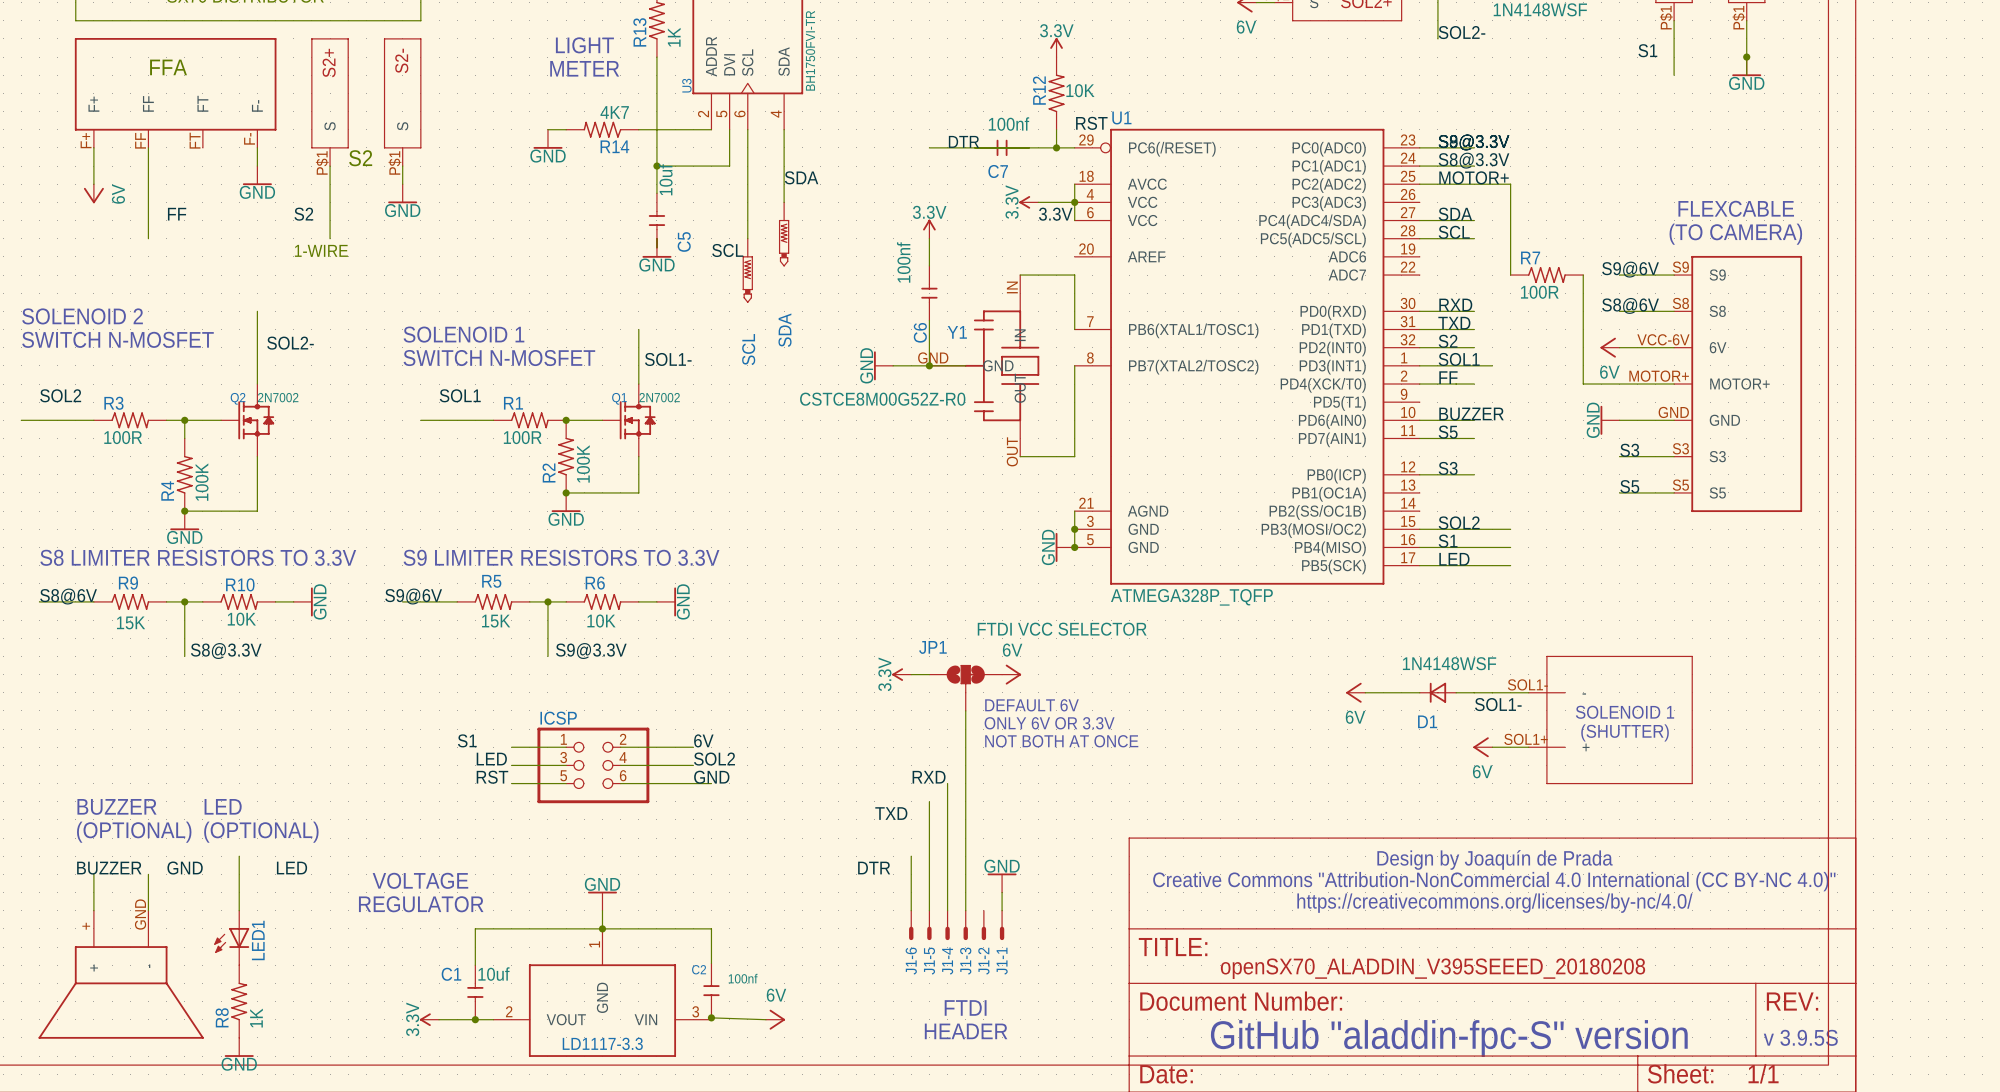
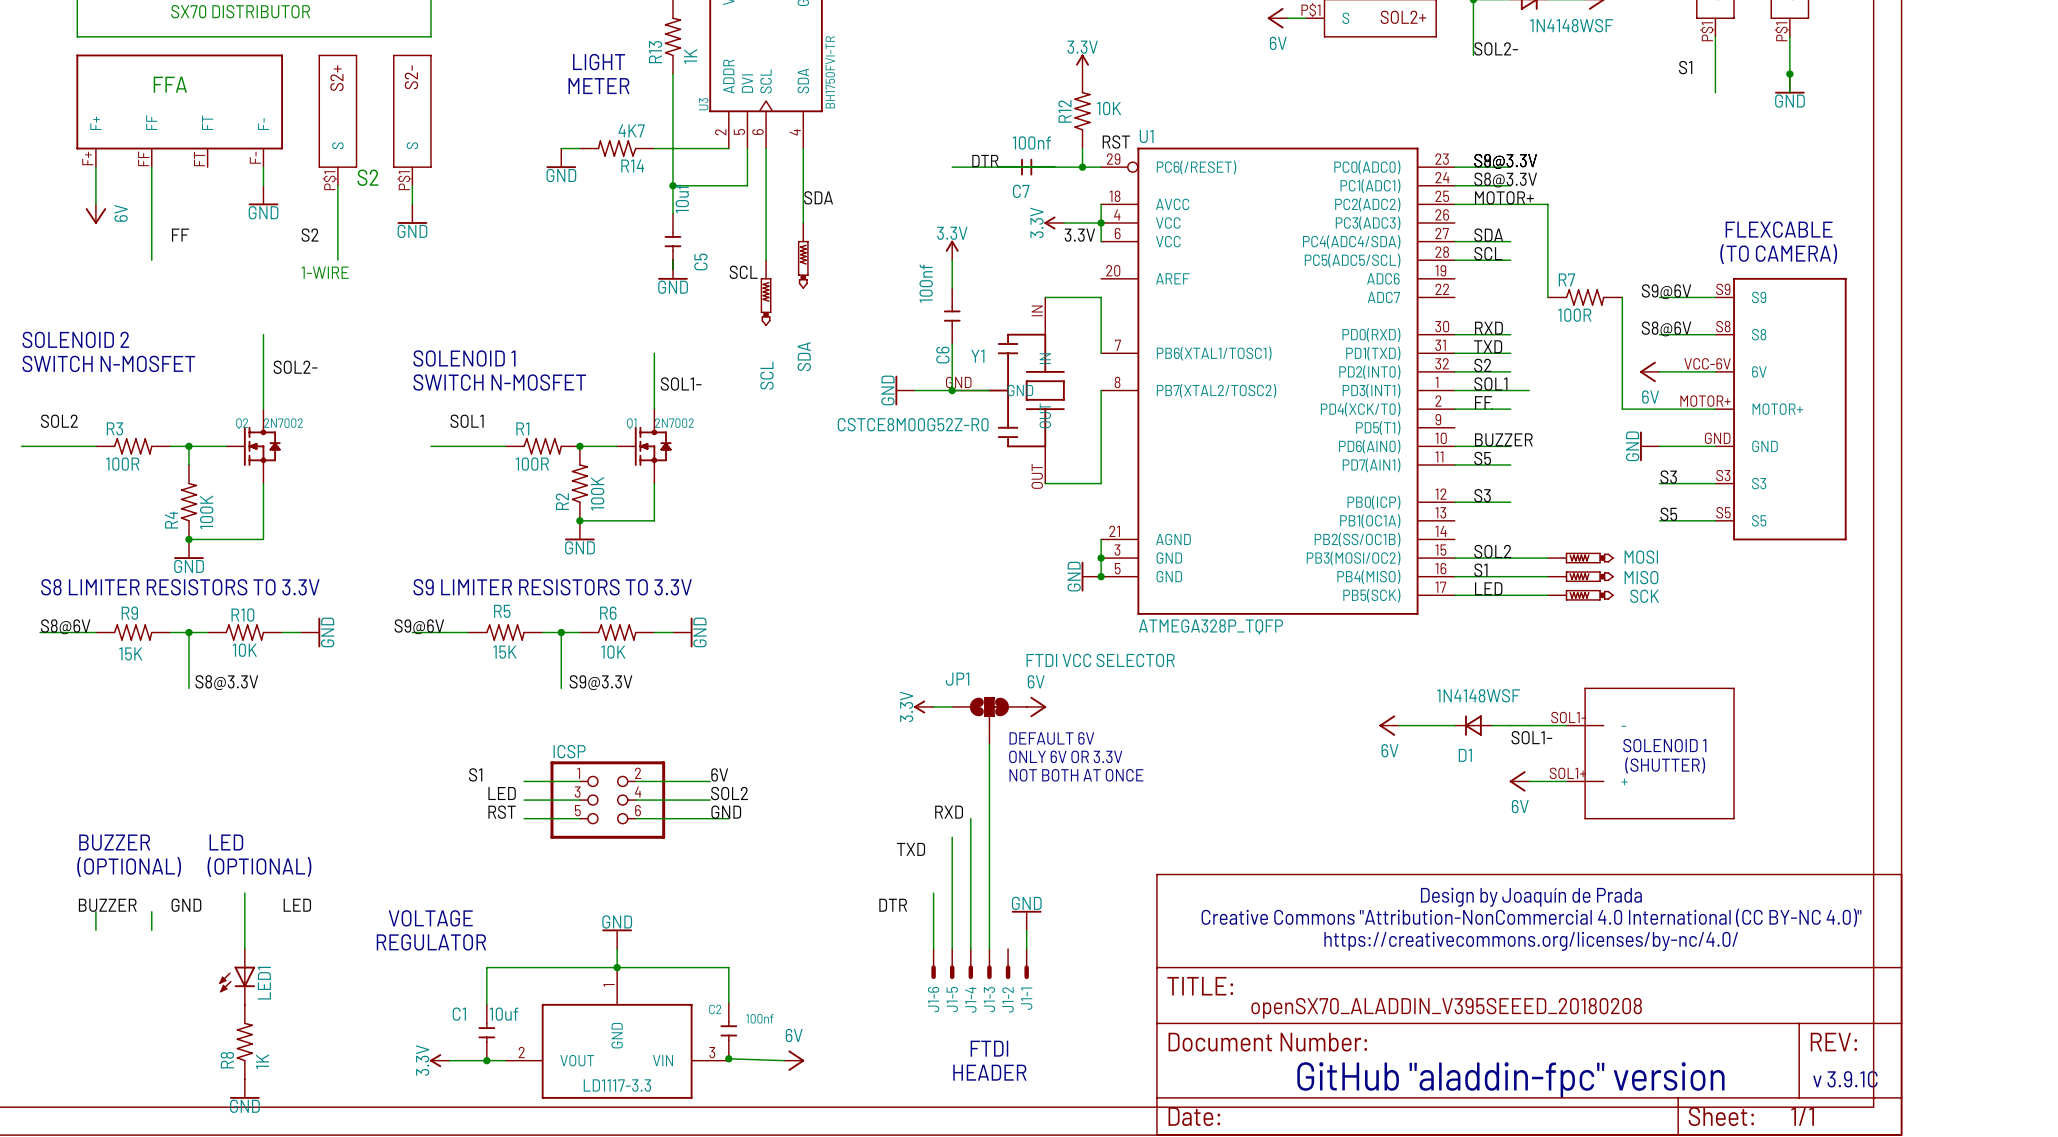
MOSI: none -> (1580, 558)
MISO: none -> (1580, 576)
SCK: none -> (1580, 595)
wire: (93, 892) (93, 910) -> none
wire: (148, 892) (148, 910) -> none
part: (121, 974) -> none
text: v 3.9.5S (1800, 1037) -> v 3.9.1C (1845, 1079)
text: GitHub "aladdin-fpc-S" version (1449, 1038) -> GitHub "aladdin-fpc" version (1510, 1080)

